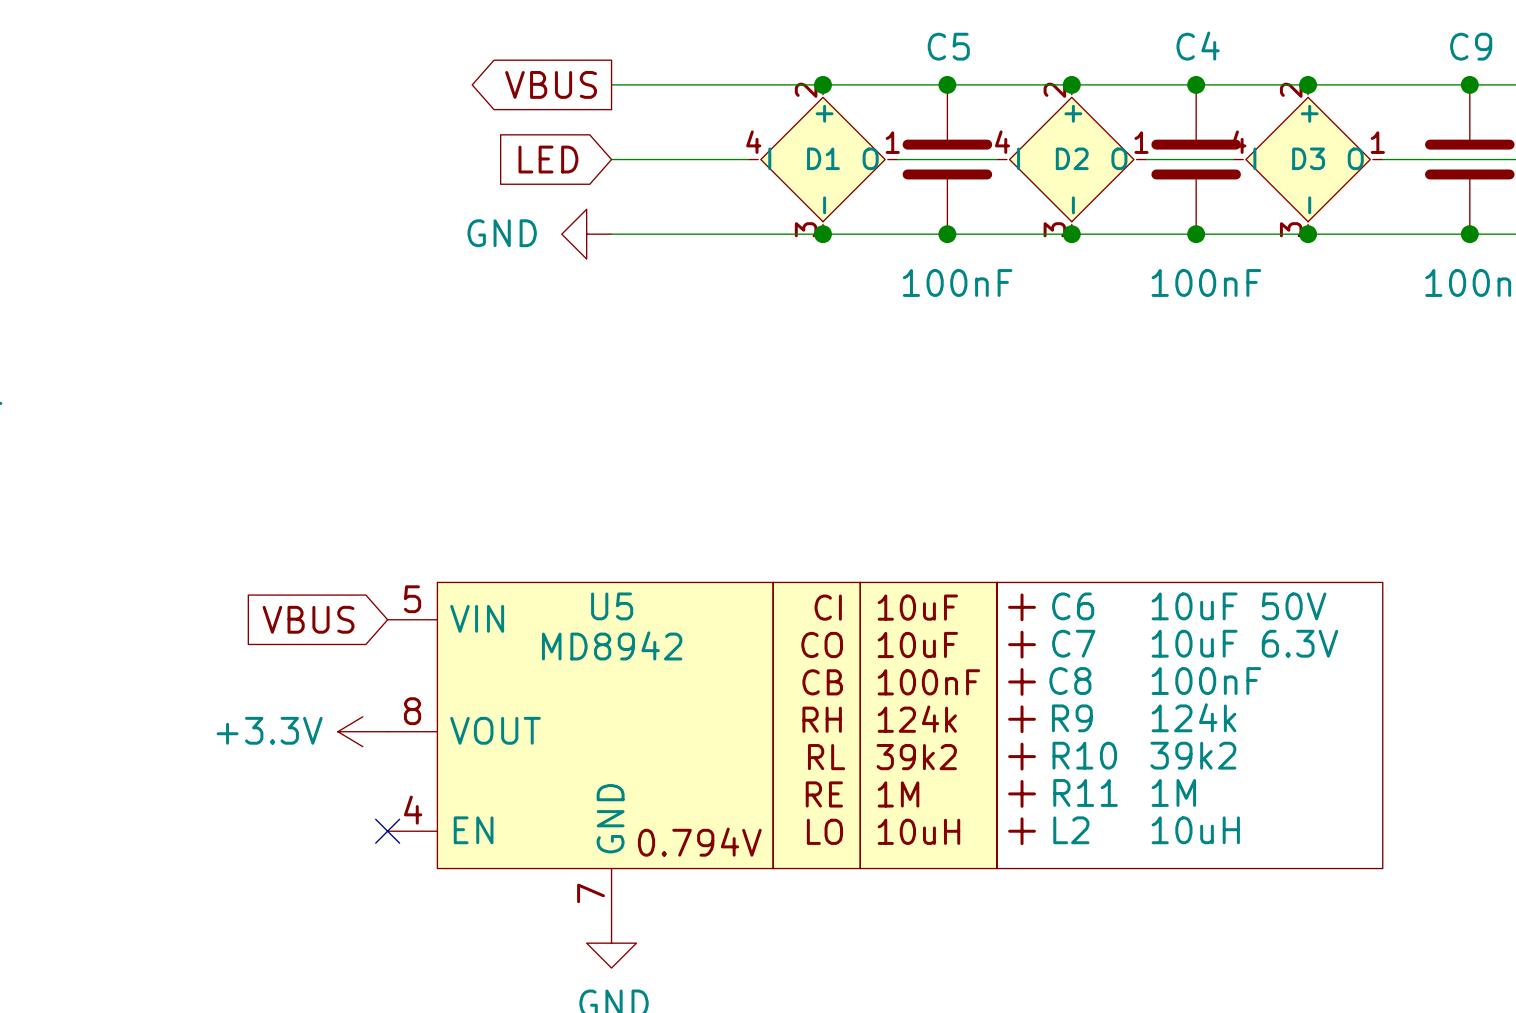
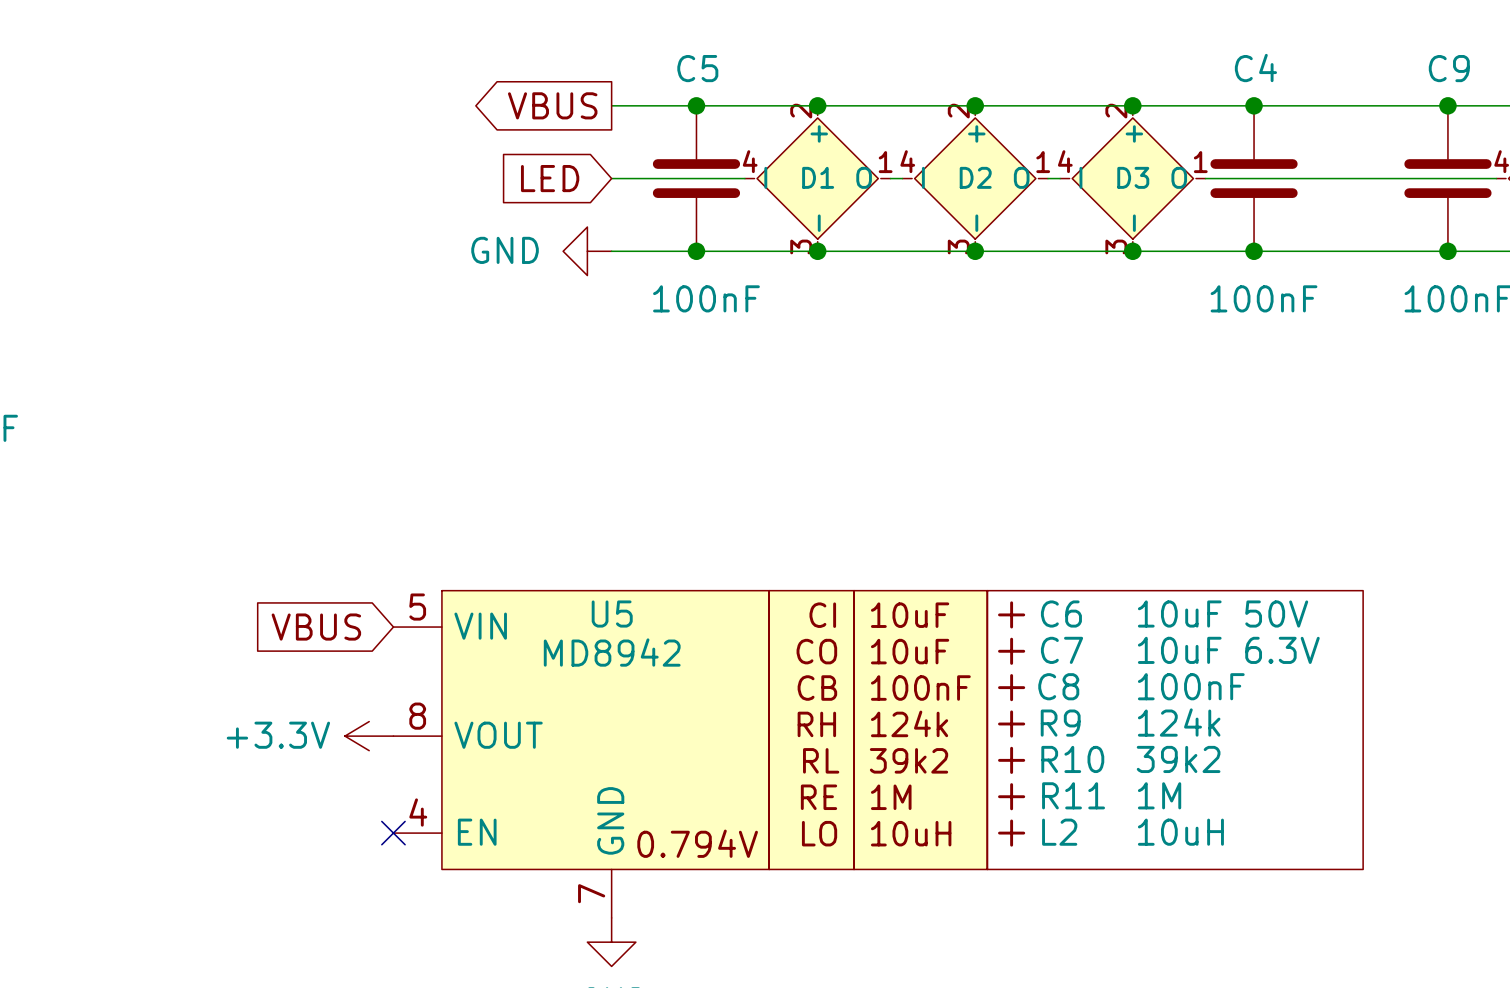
junction: none -> (696, 105)
junction position: (947, 84) -> (975, 105)
junction: (1071, 84) -> none
junction: none -> (1132, 105)
junction: (1196, 84) -> none
junction: none -> (1254, 105)
junction: (1308, 84) -> none
C5 position: (947, 159) -> (696, 178)
D2 position: (1071, 159) -> (975, 178)
C4 position: (1196, 159) -> (1254, 178)
D3 position: (1308, 159) -> (1132, 178)
junction: none -> (696, 251)
junction position: (947, 234) -> (975, 251)
junction: (1071, 234) -> none
junction: none -> (1132, 251)
junction: (1196, 234) -> none
junction: none -> (1254, 251)
junction: (1308, 234) -> none

